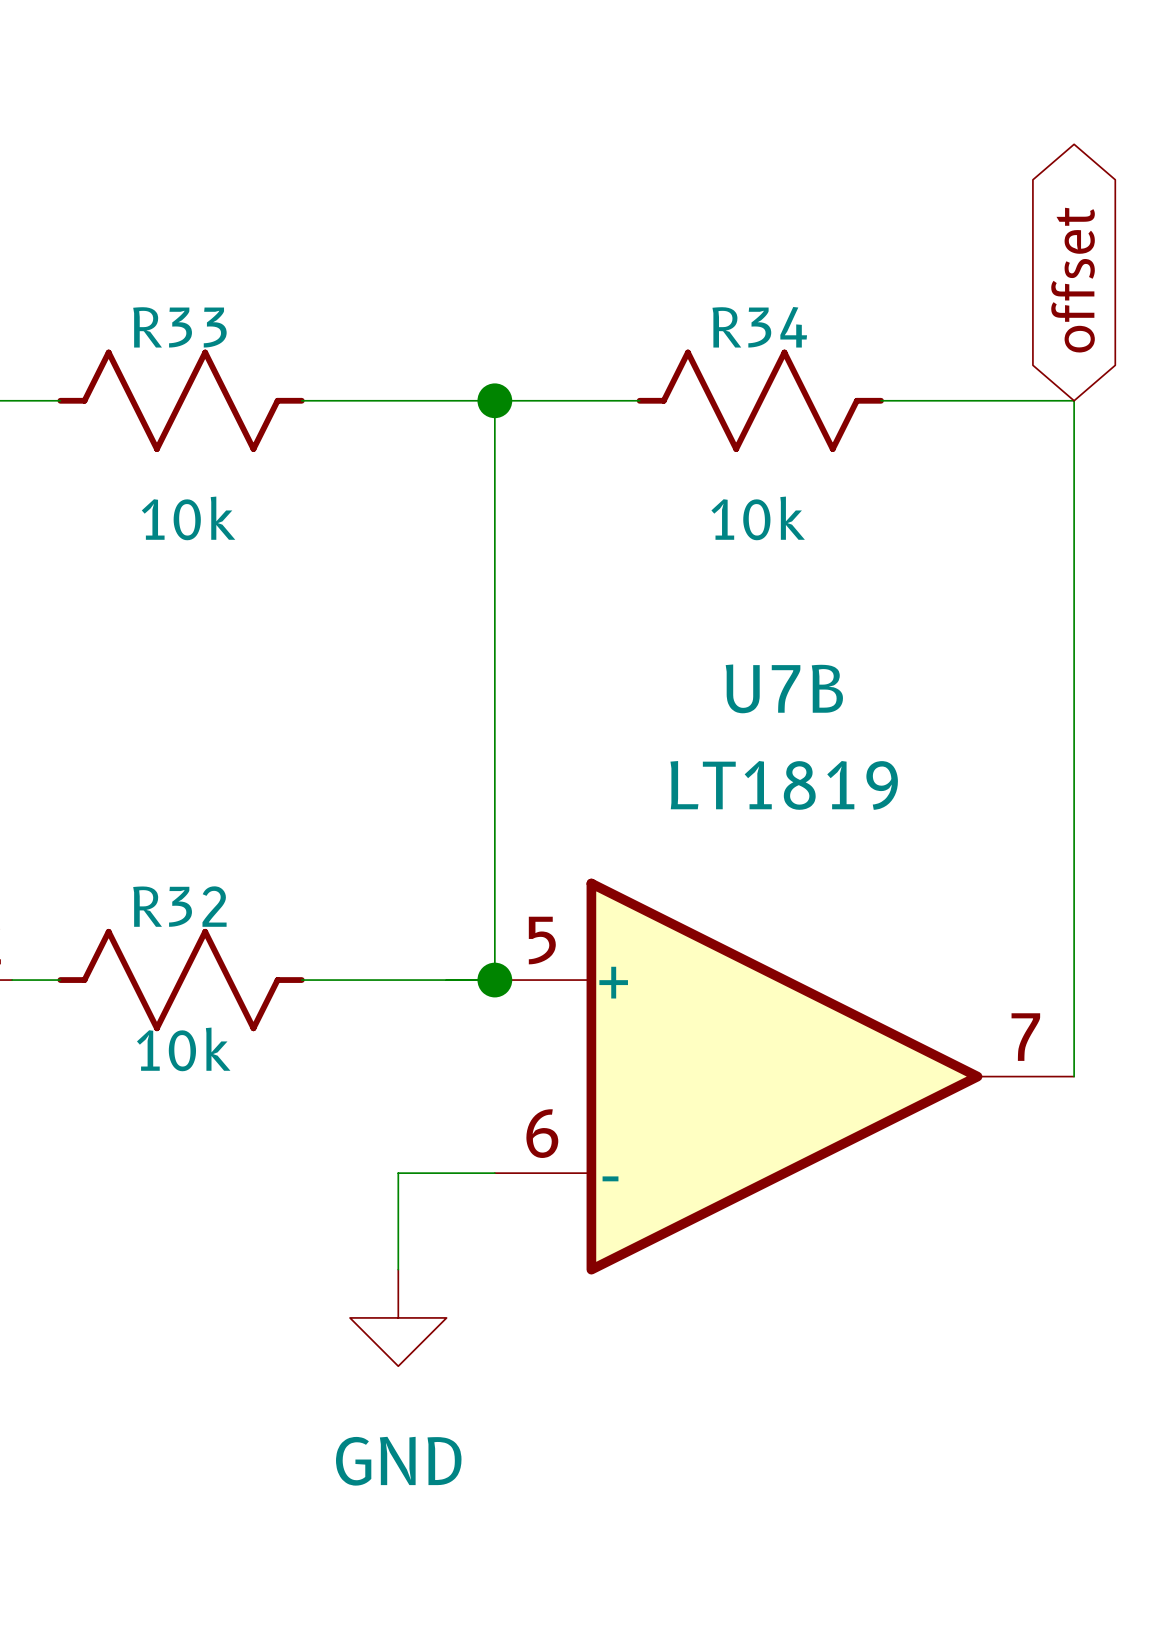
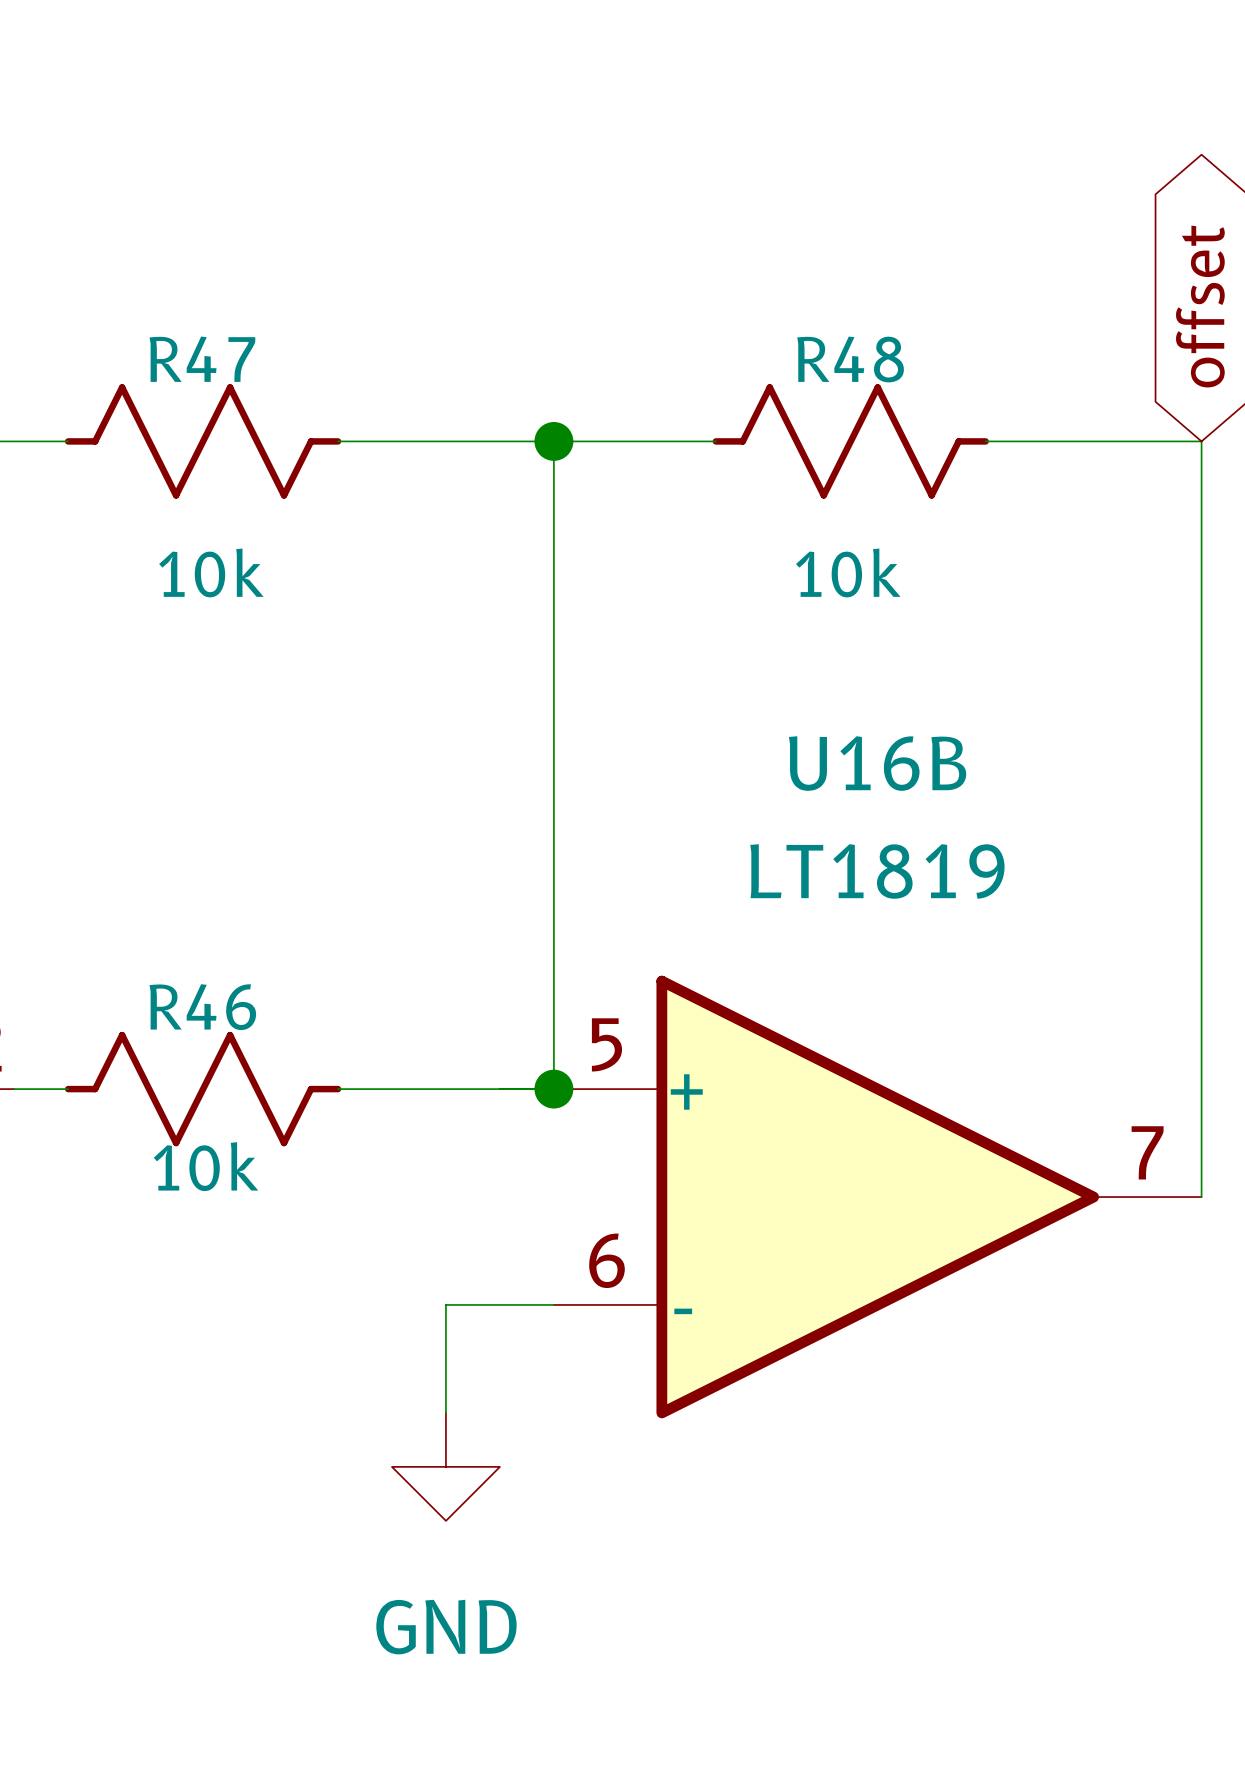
R33 name: R33 (179, 327) -> R47 (202, 359)
R34 name: R34 (759, 327) -> R48 (850, 359)
U7B name: U7B (784, 688) -> U16B (877, 763)
R32 name: R32 (179, 906) -> R46 (202, 1007)

